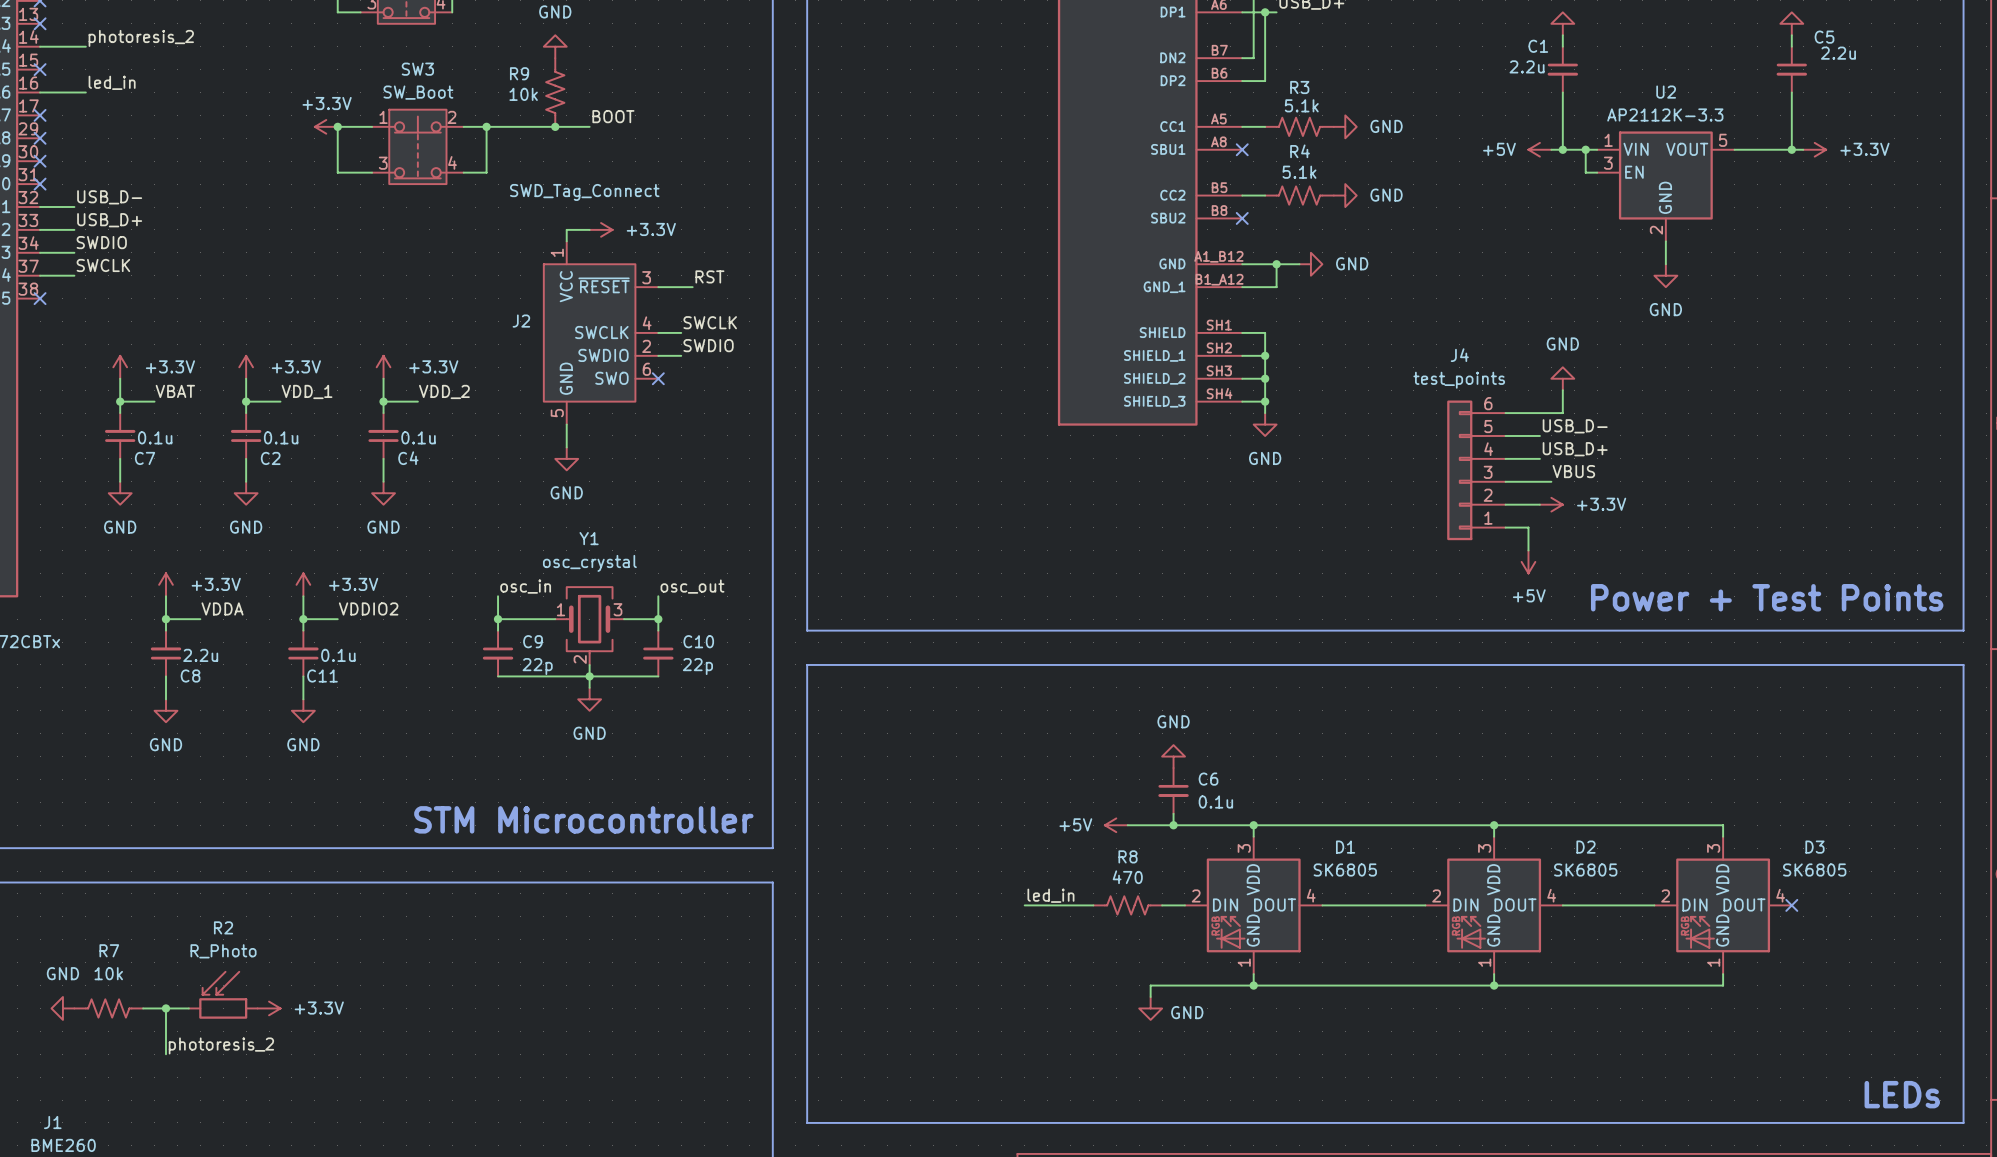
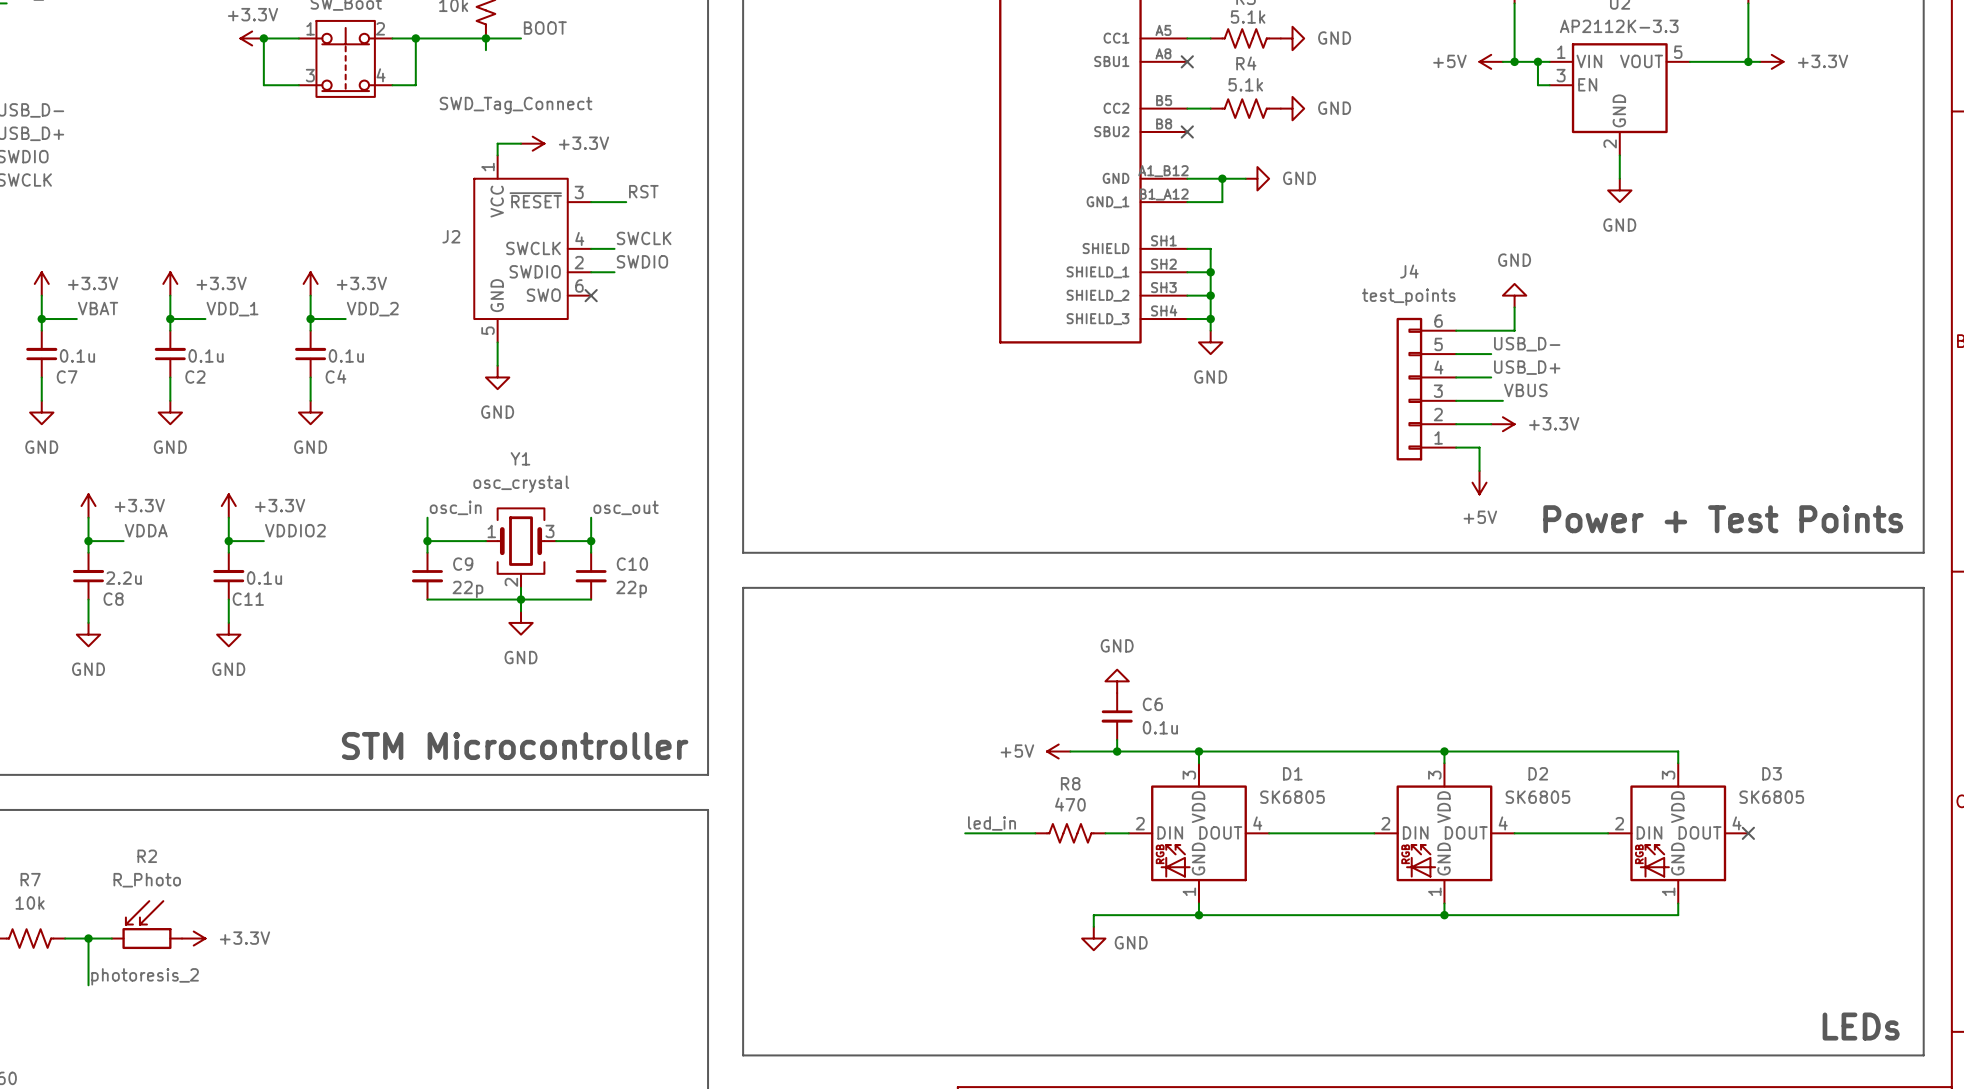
wire: none -> (485, 38) (485, 50)

